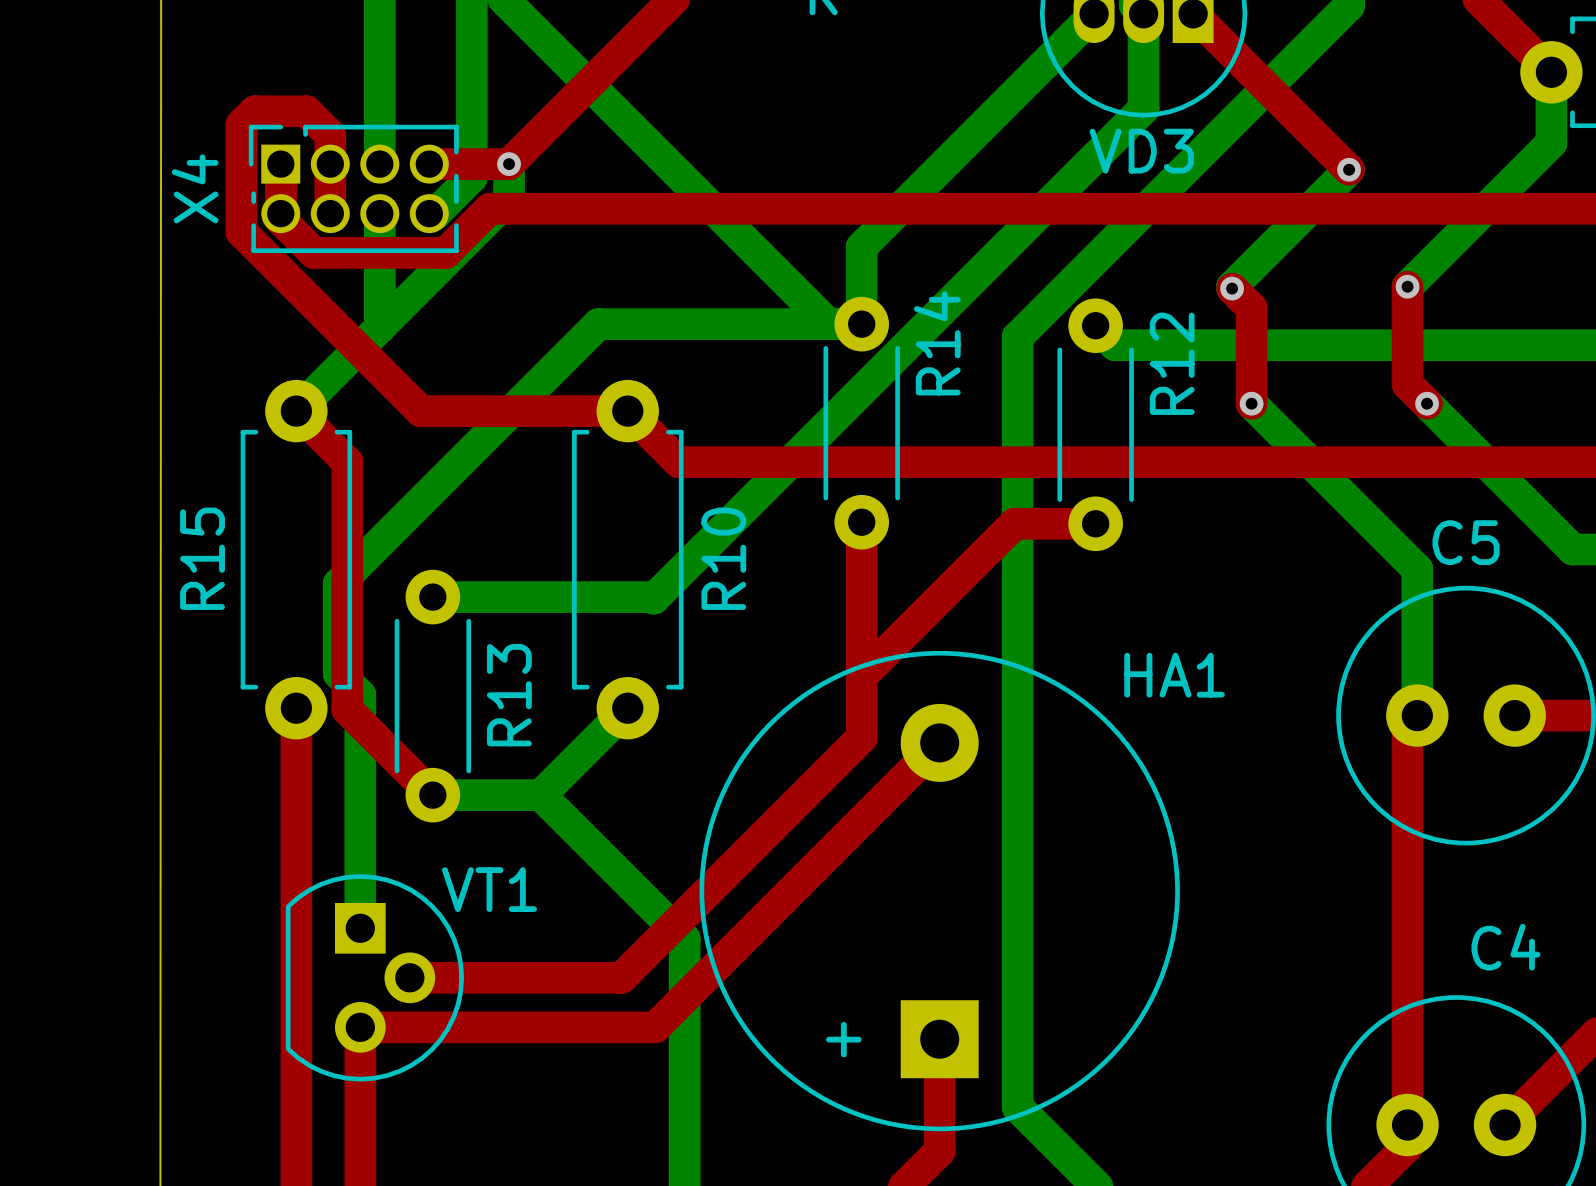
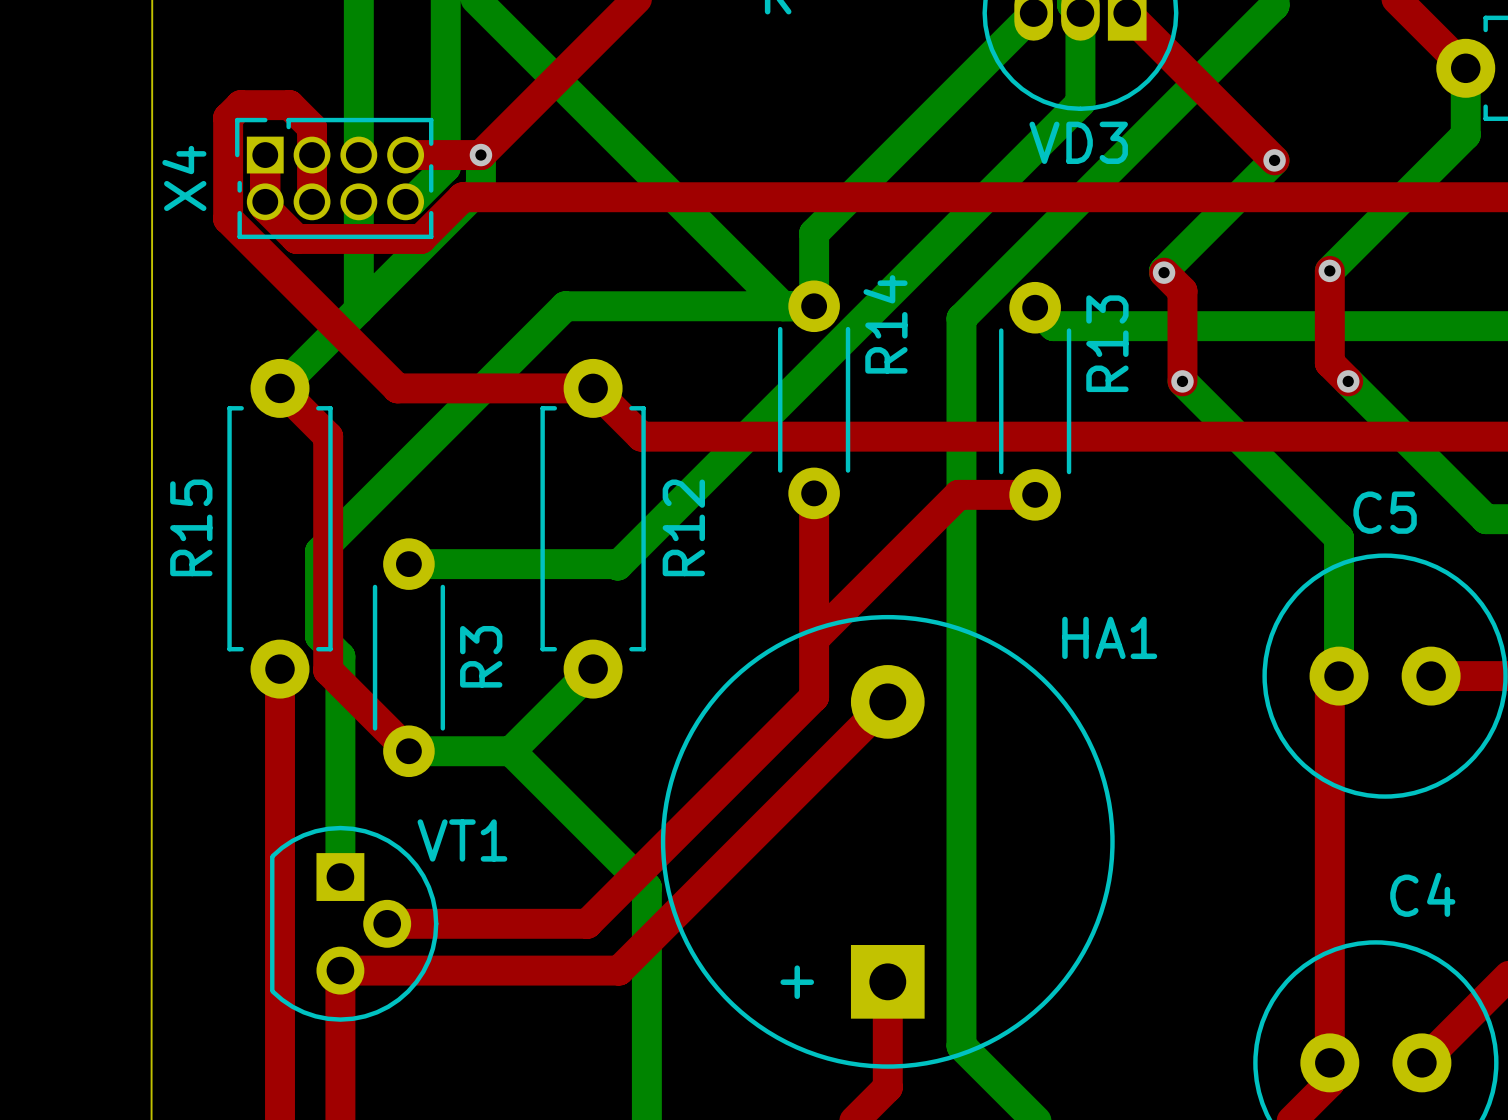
R12 name: R12 (1172, 363) -> R13 (1107, 343)
R10 name: R10 (723, 558) -> R12 (683, 527)
R13 name: R13 (509, 695) -> R3 (481, 656)

